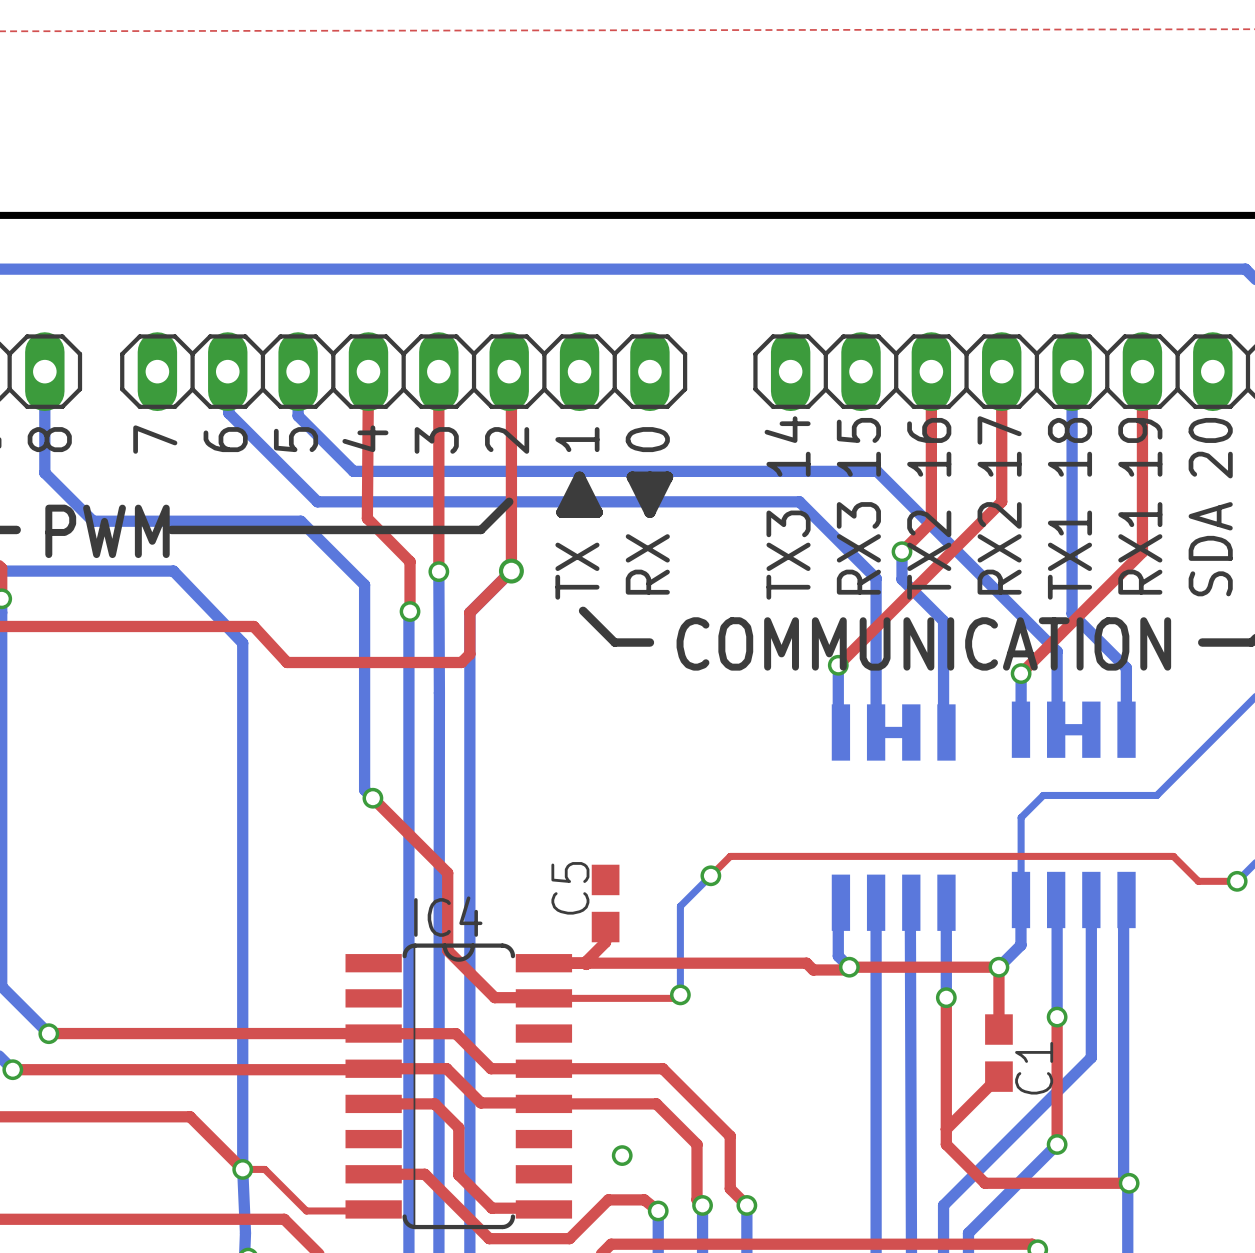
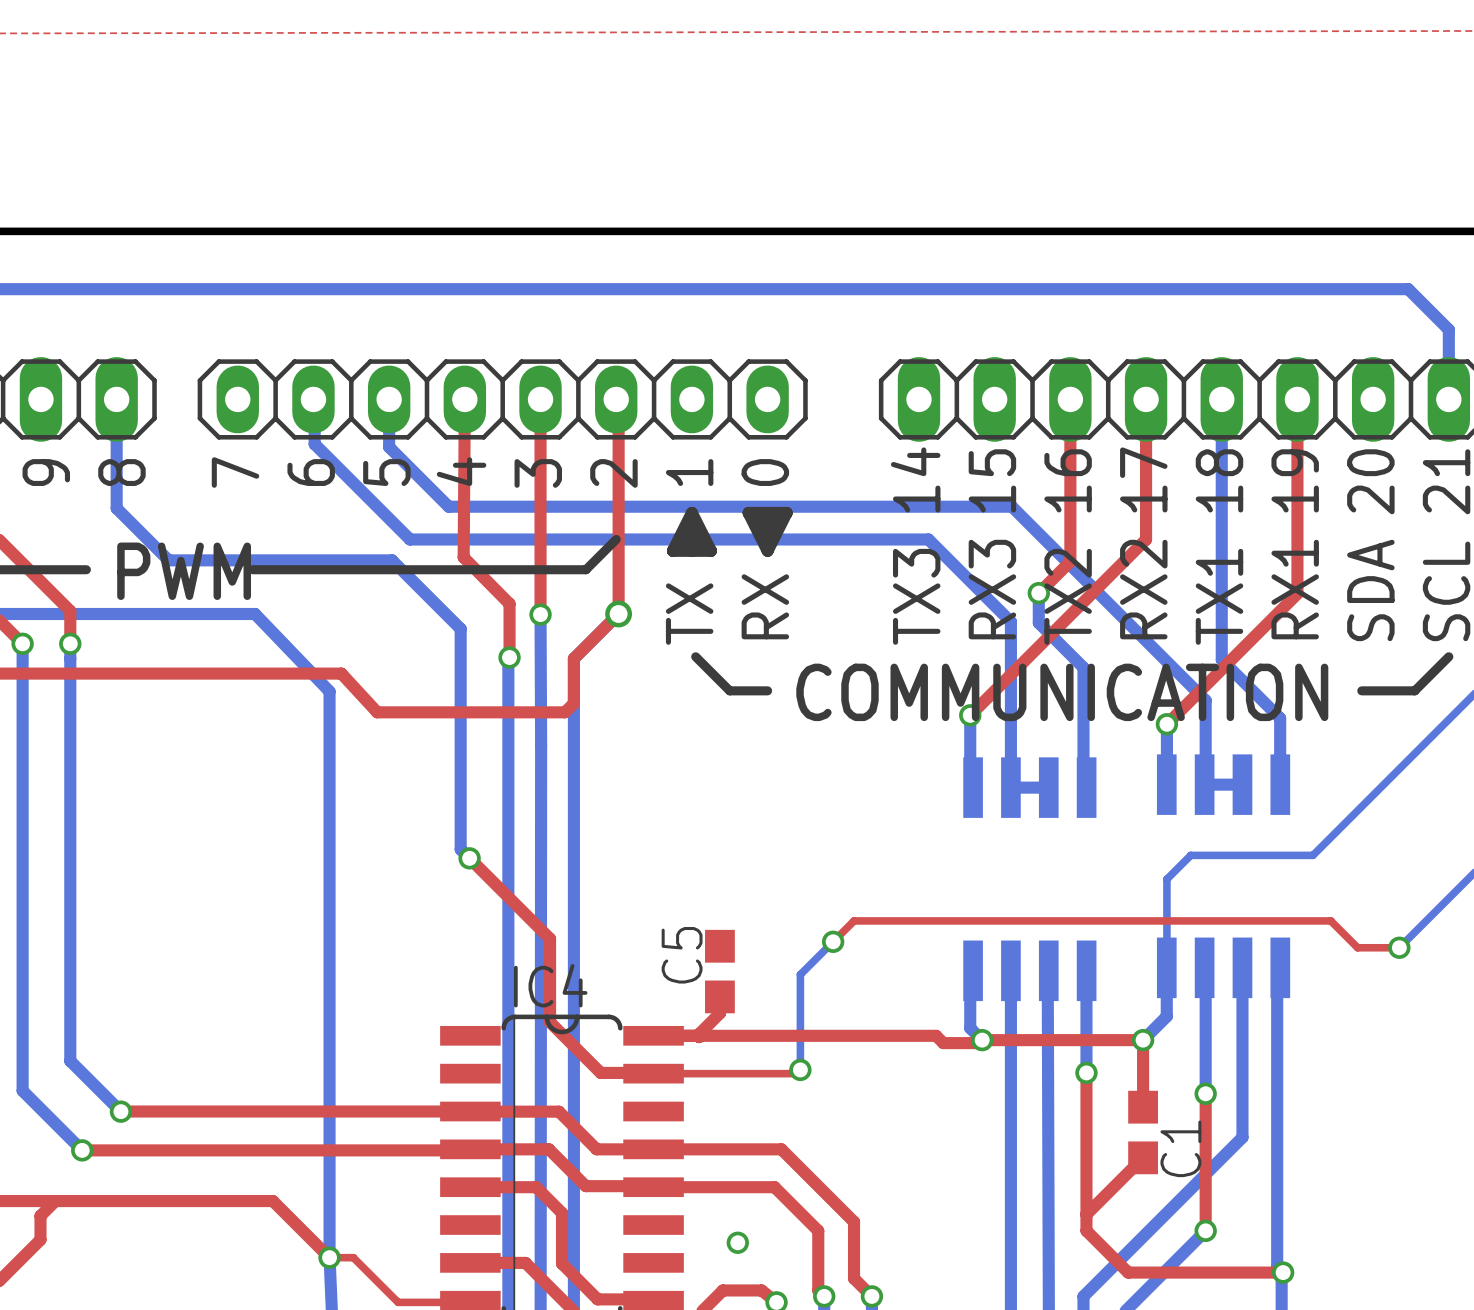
part footprint: [120, 332, 688, 412] -> [197, 359, 808, 440]

